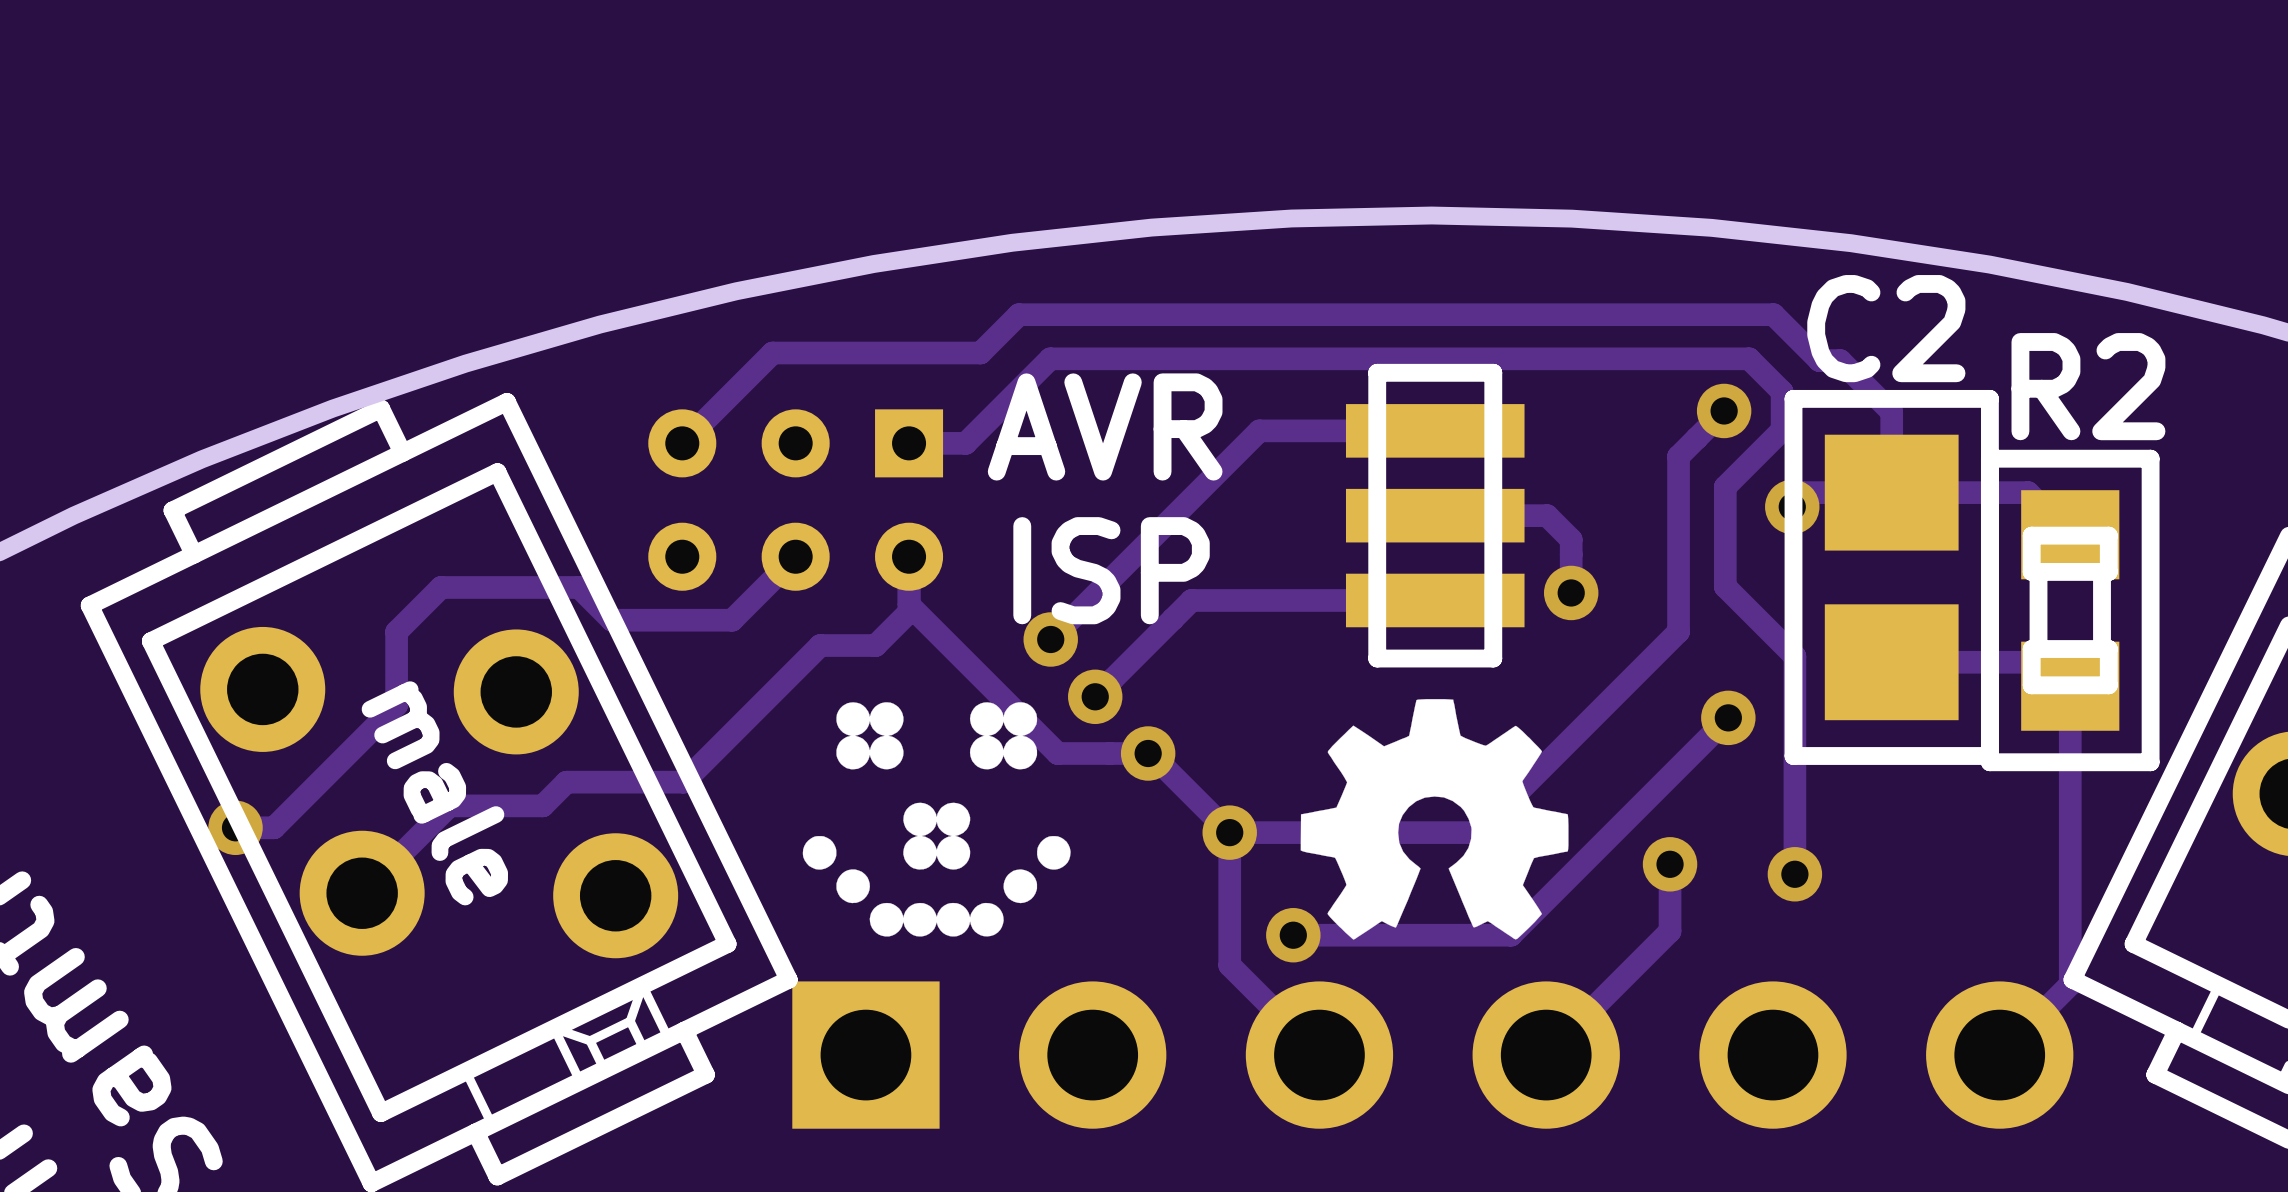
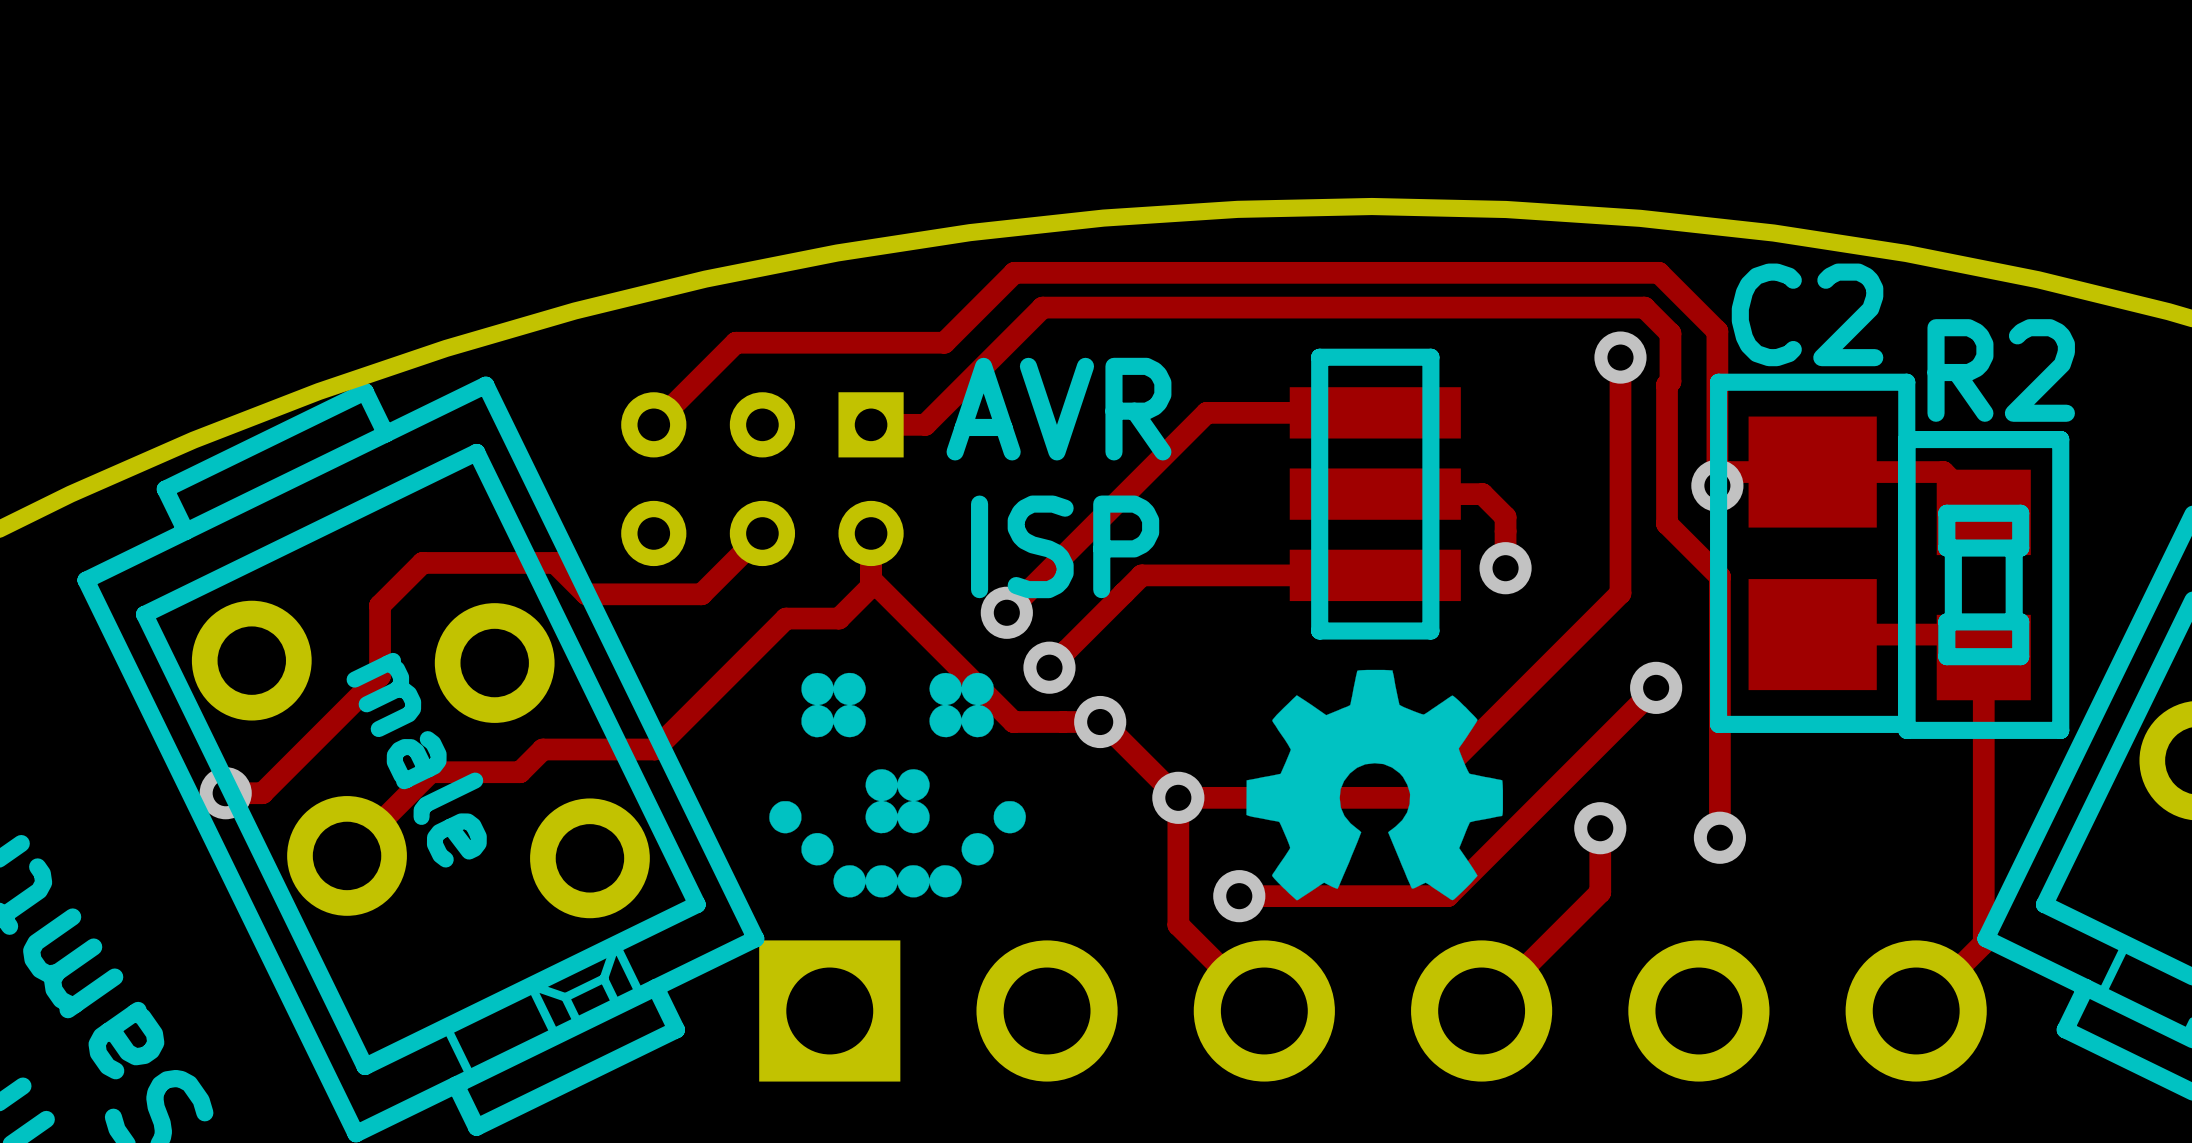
track: (767, 357) (772, 353) (980, 353) (1018, 314) (1773, 314) (1819, 360) (1840, 360) (1891, 412) (1891, 492) -> (735, 342) (944, 342) (1014, 272) (1658, 272) (1717, 331) (1717, 481)
track: (1050, 358) (1749, 358) (1782, 391) (1782, 430) (1725, 486) (1725, 586) (1794, 656) -> (1006, 343) (1042, 307) (1644, 307) (1670, 333) (1670, 381) (1667, 385) (1667, 523) (1719, 576) (1719, 628)
track: (1724, 410) (1678, 456) (1678, 631) -> (1620, 357) (1620, 593) (1608, 605)
via position: (1724, 410) -> (1620, 357)

